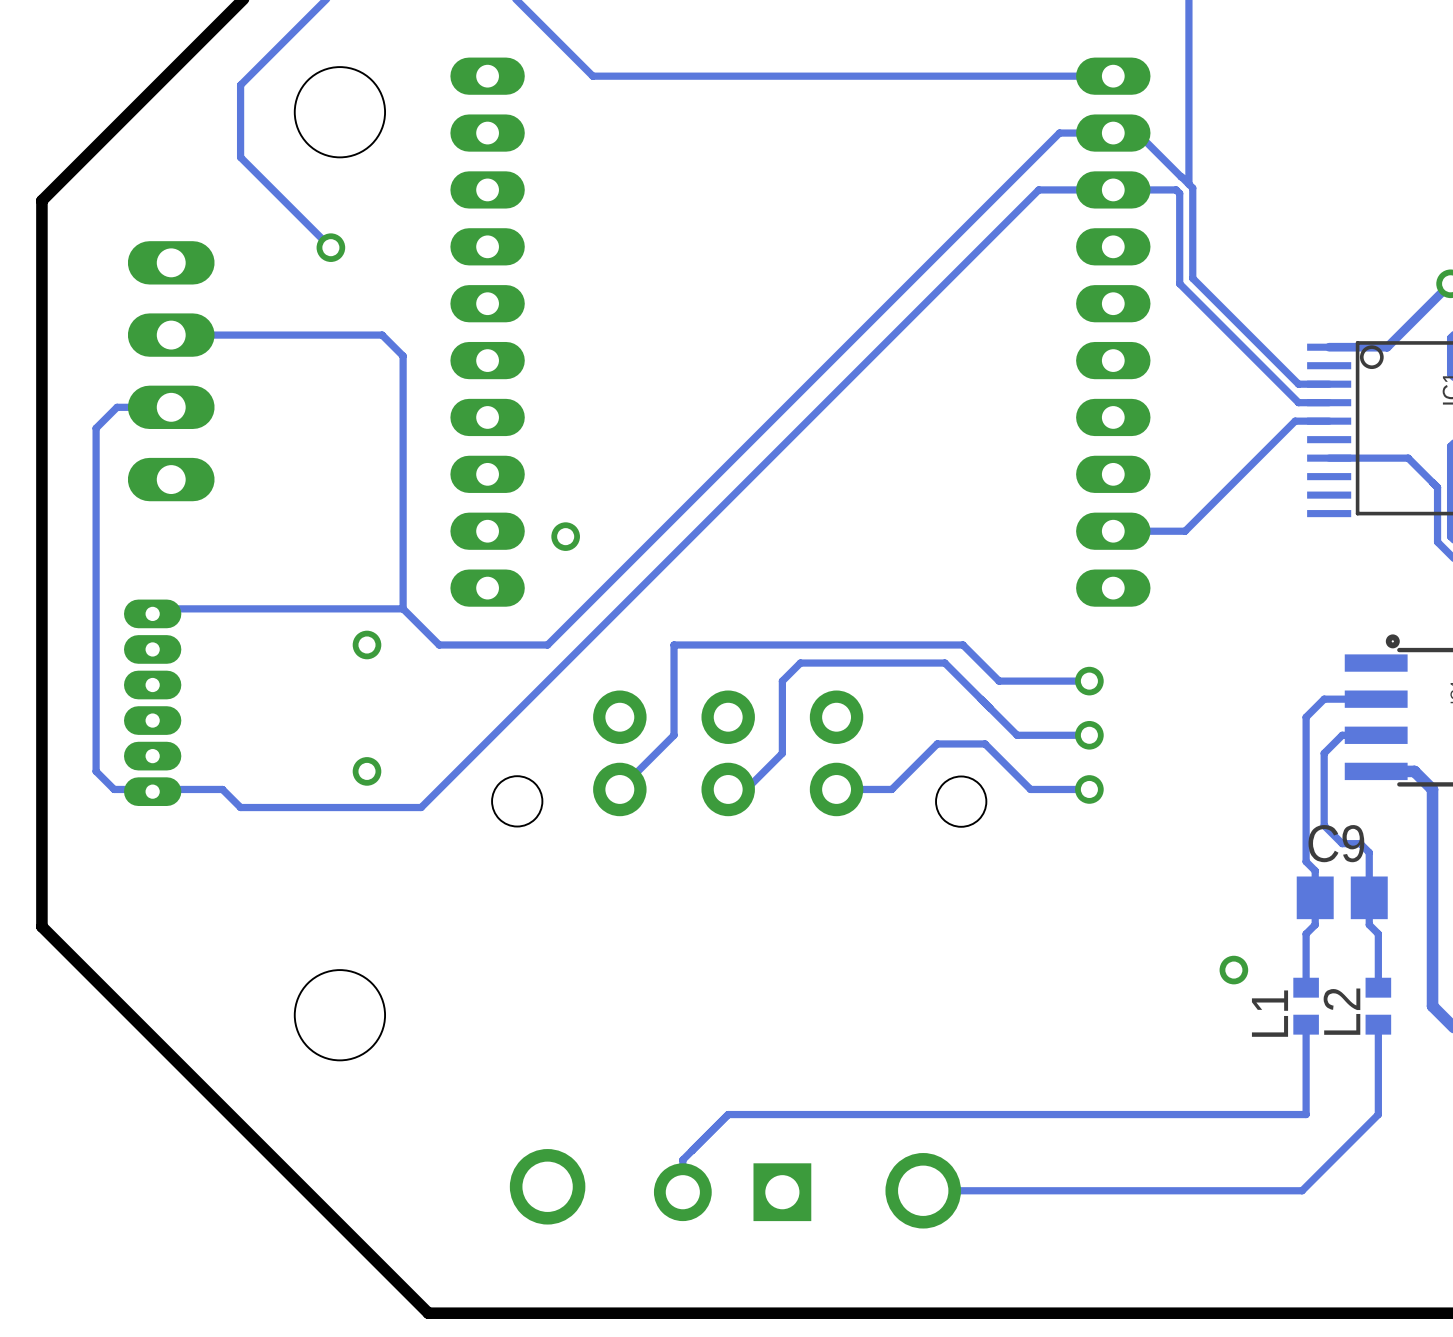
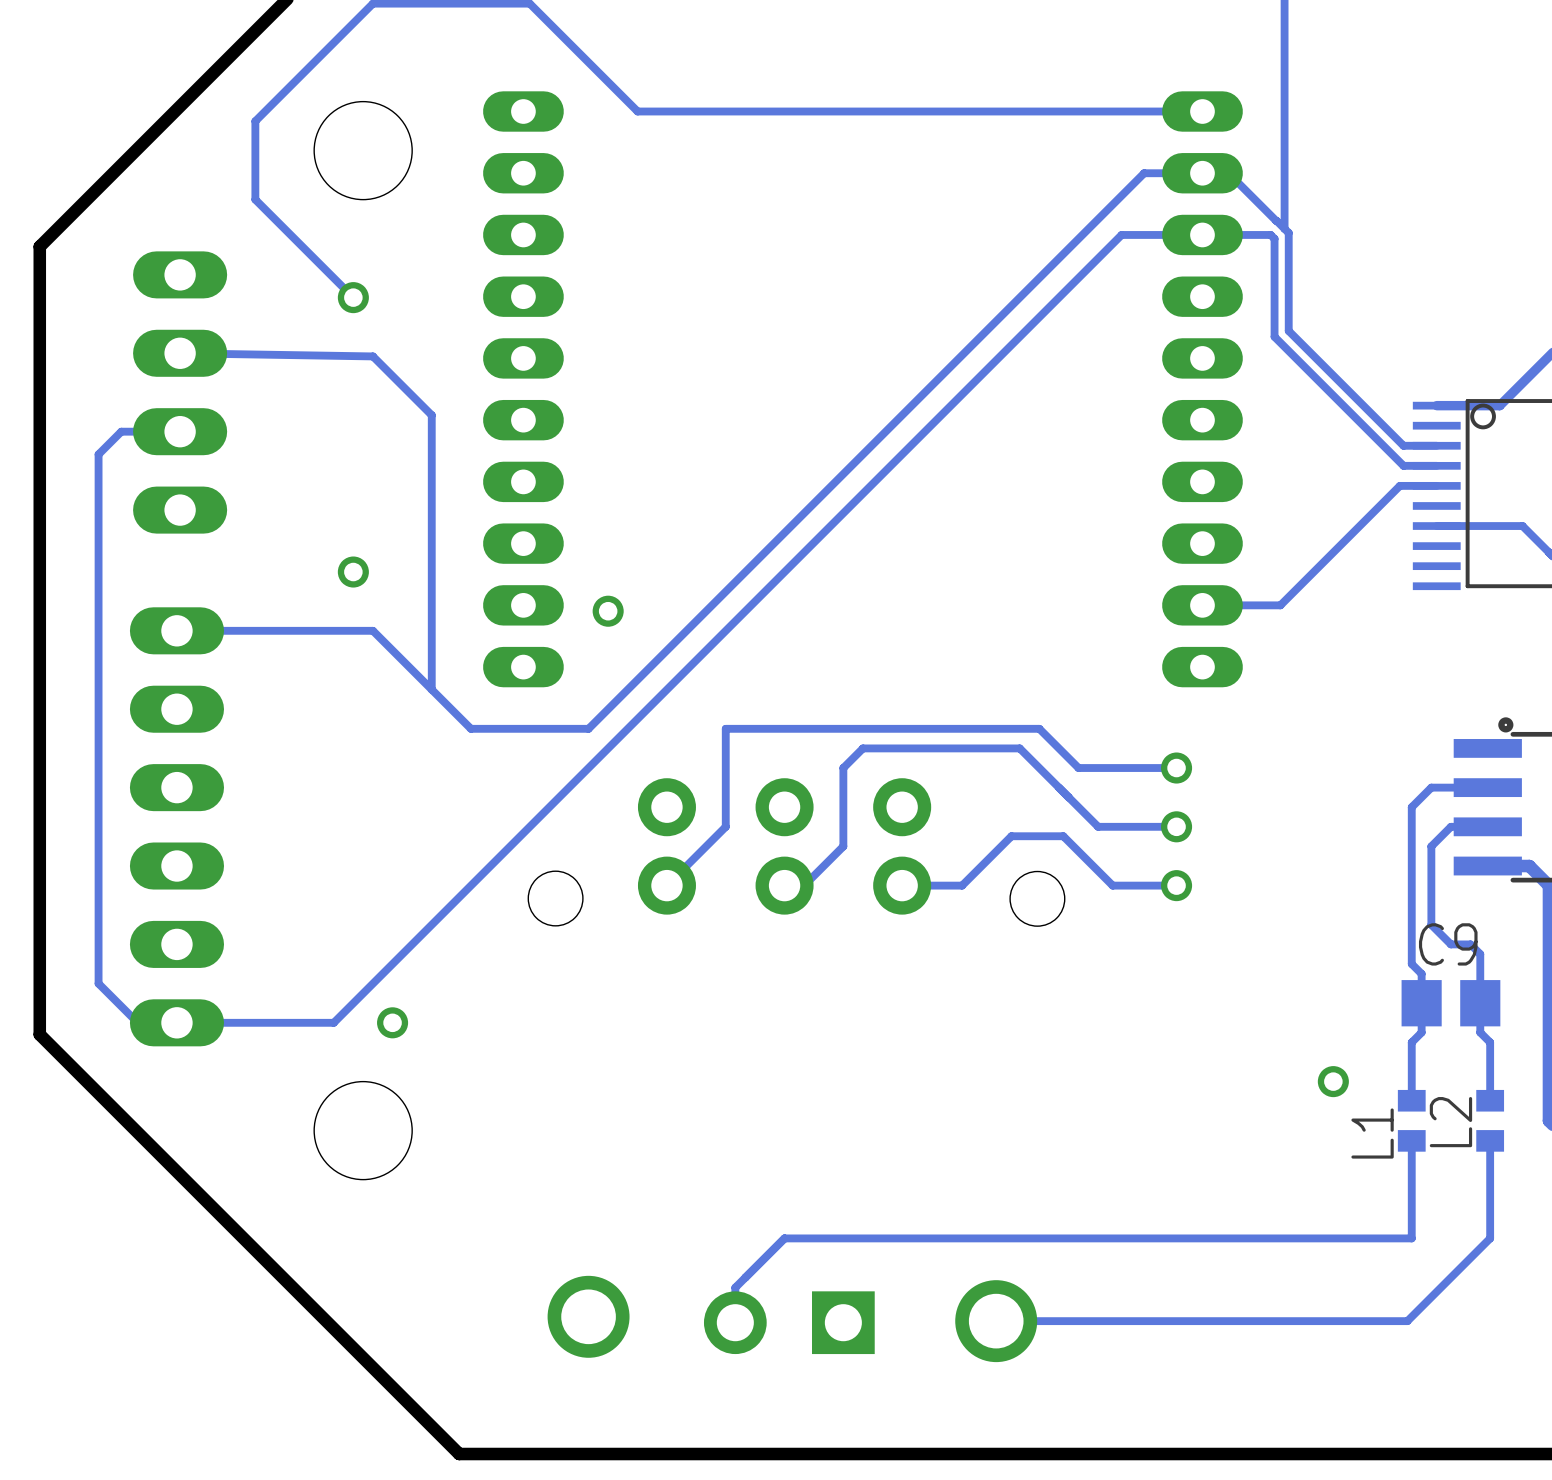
track: (382, 335) (171, 335) -> (409, 392) (372, 356) (180, 353)
part position: (171, 371) -> (180, 392)
track: (171, 407) (117, 407) (96, 428) -> (180, 431) (121, 431) (98, 454) (98, 493)
via: none -> (353, 572)
track: (403, 608) (157, 608) (152, 613) -> (431, 689) (372, 630) (176, 630)
via: (367, 644) -> none
part: (152, 702) -> none
part: none -> (176, 826)
track: (96, 771) (114, 789) (150, 789) (152, 791) (154, 789) (222, 789) (240, 807) (421, 807) -> (98, 866) (98, 983) (137, 1022) (333, 1022) (451, 905)
via: (367, 771) -> none
via: none -> (392, 1022)

